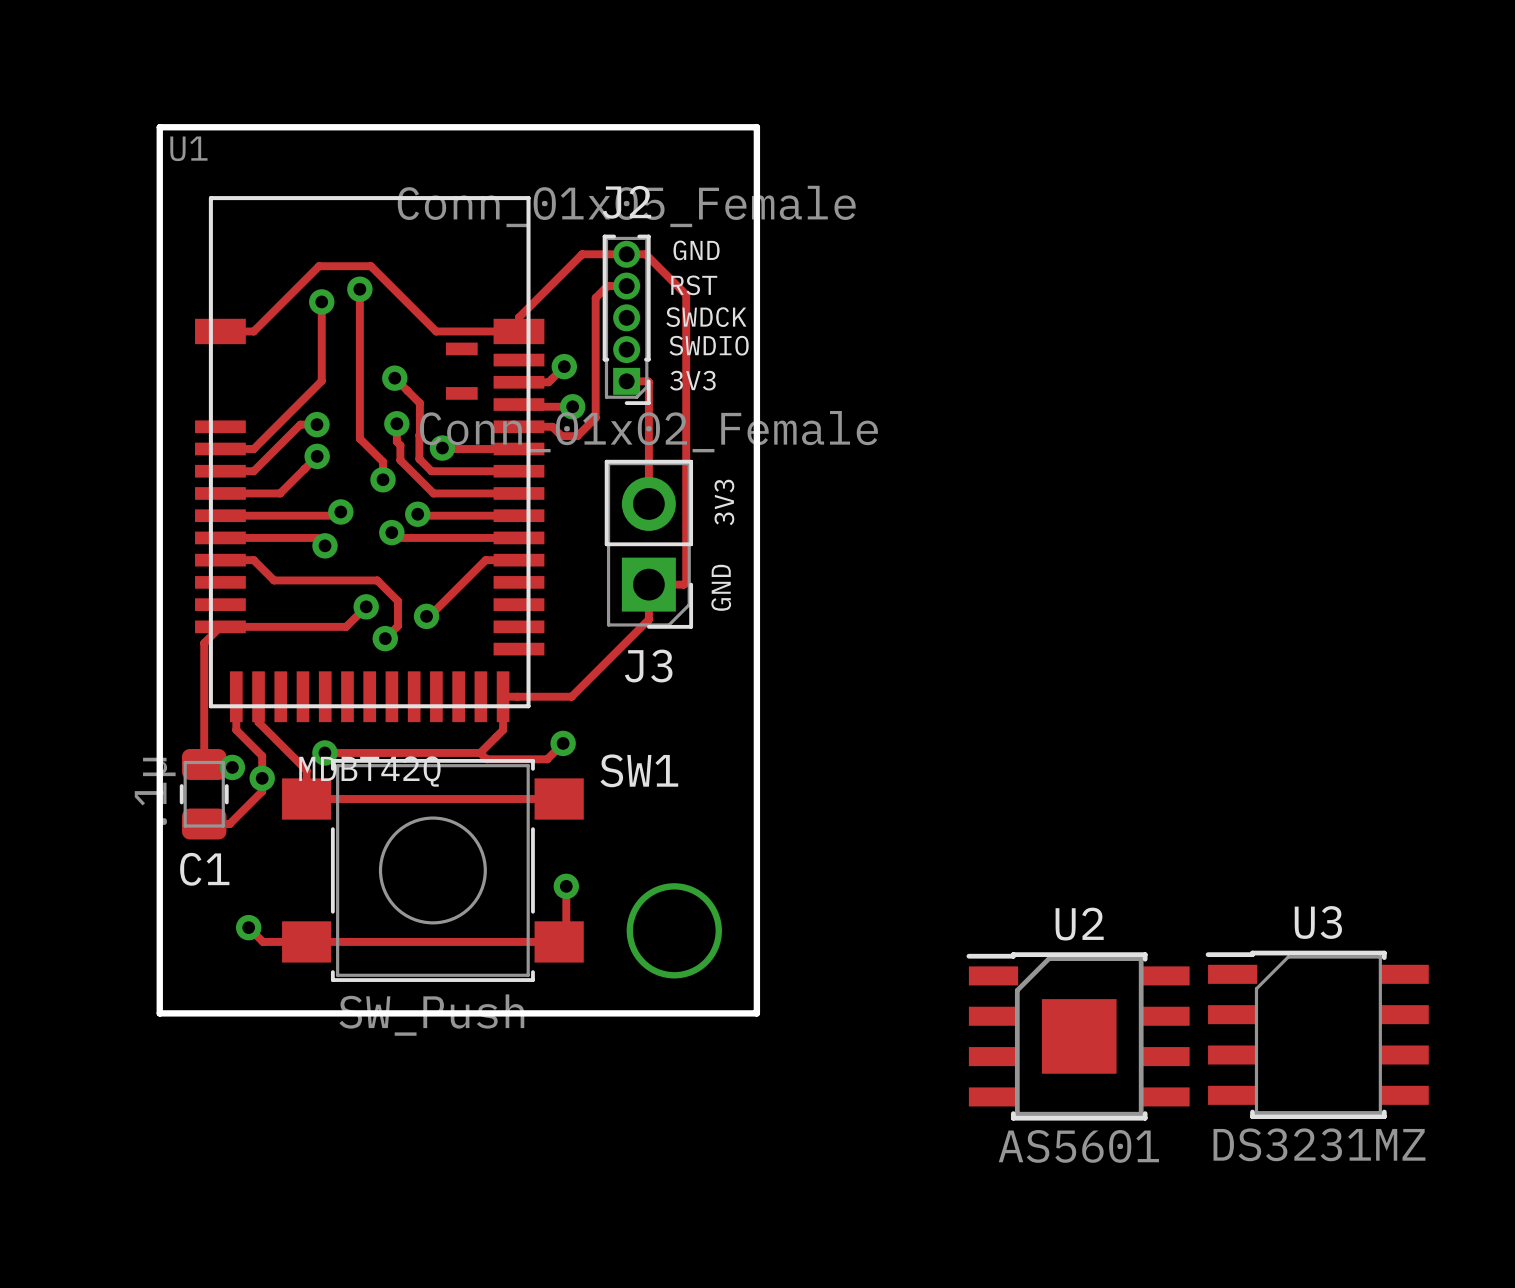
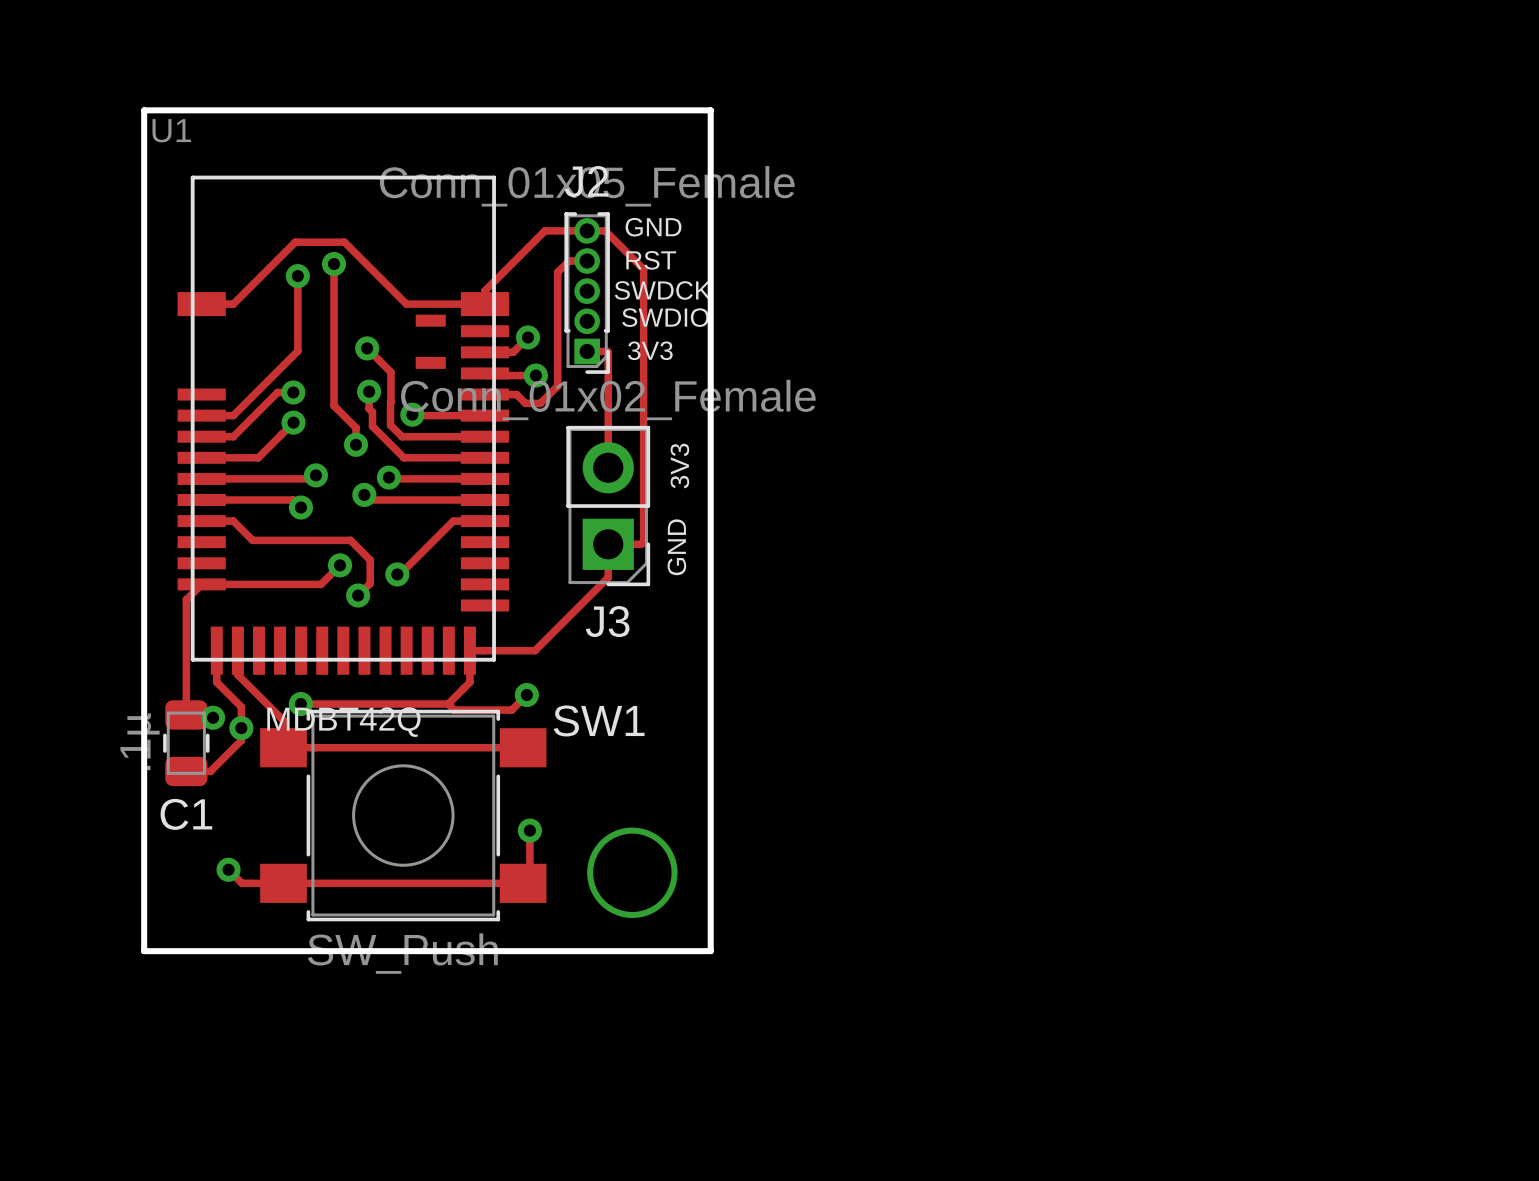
U3: DS3231MZ (1317, 1034) -> none
U2: AS5601 (1078, 1036) -> none

